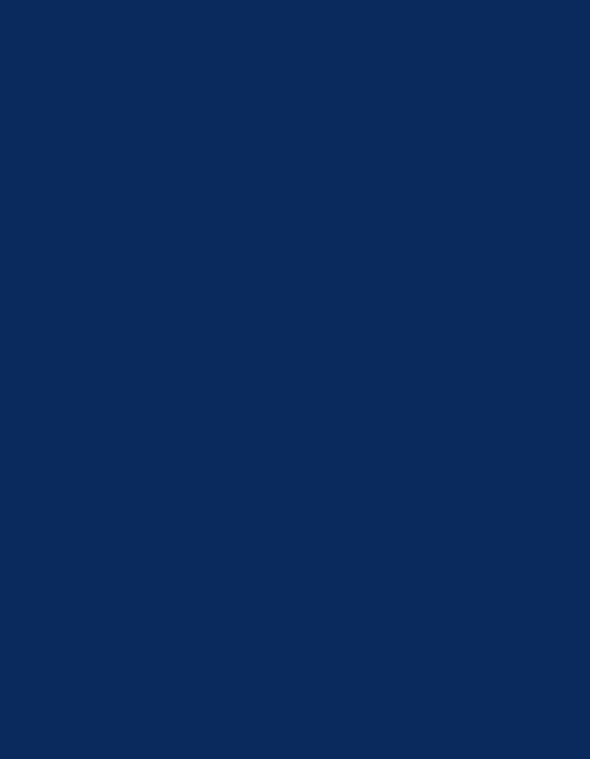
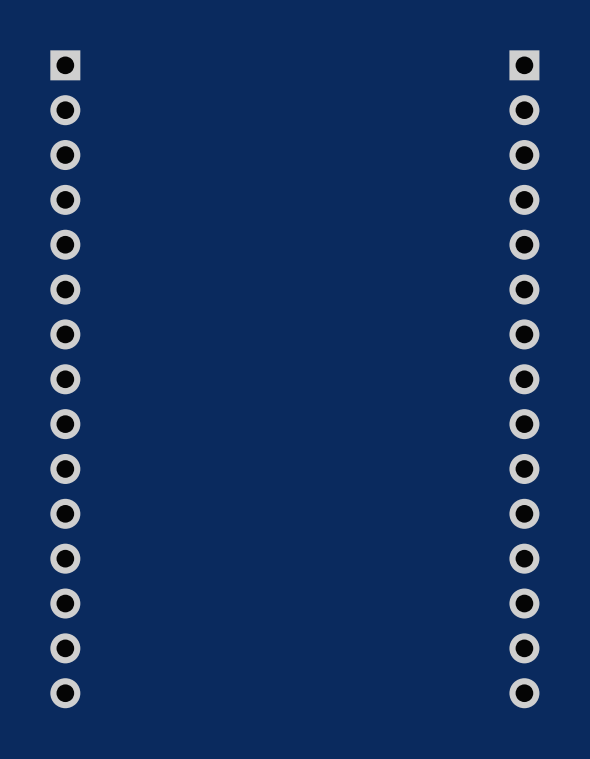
part: none -> (65, 379)
part: none -> (524, 379)

